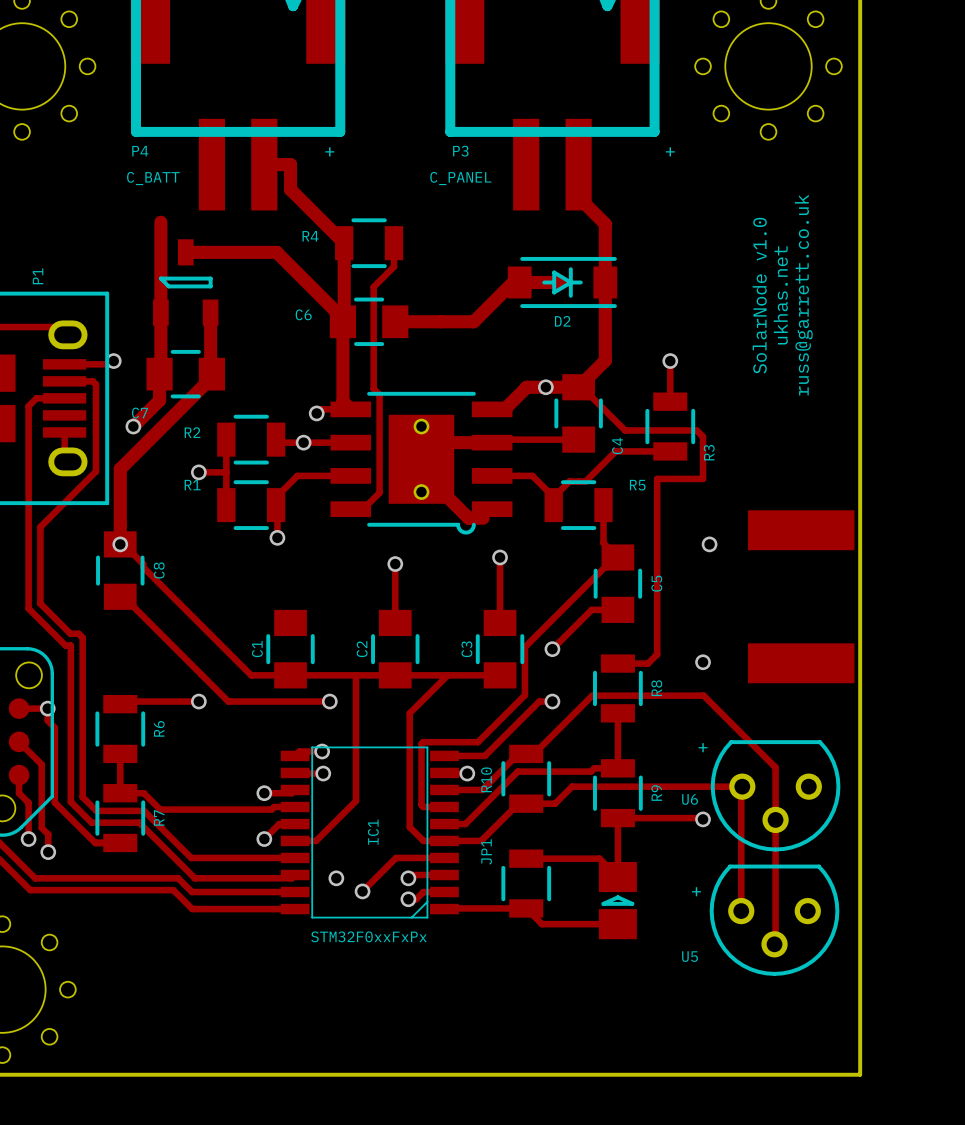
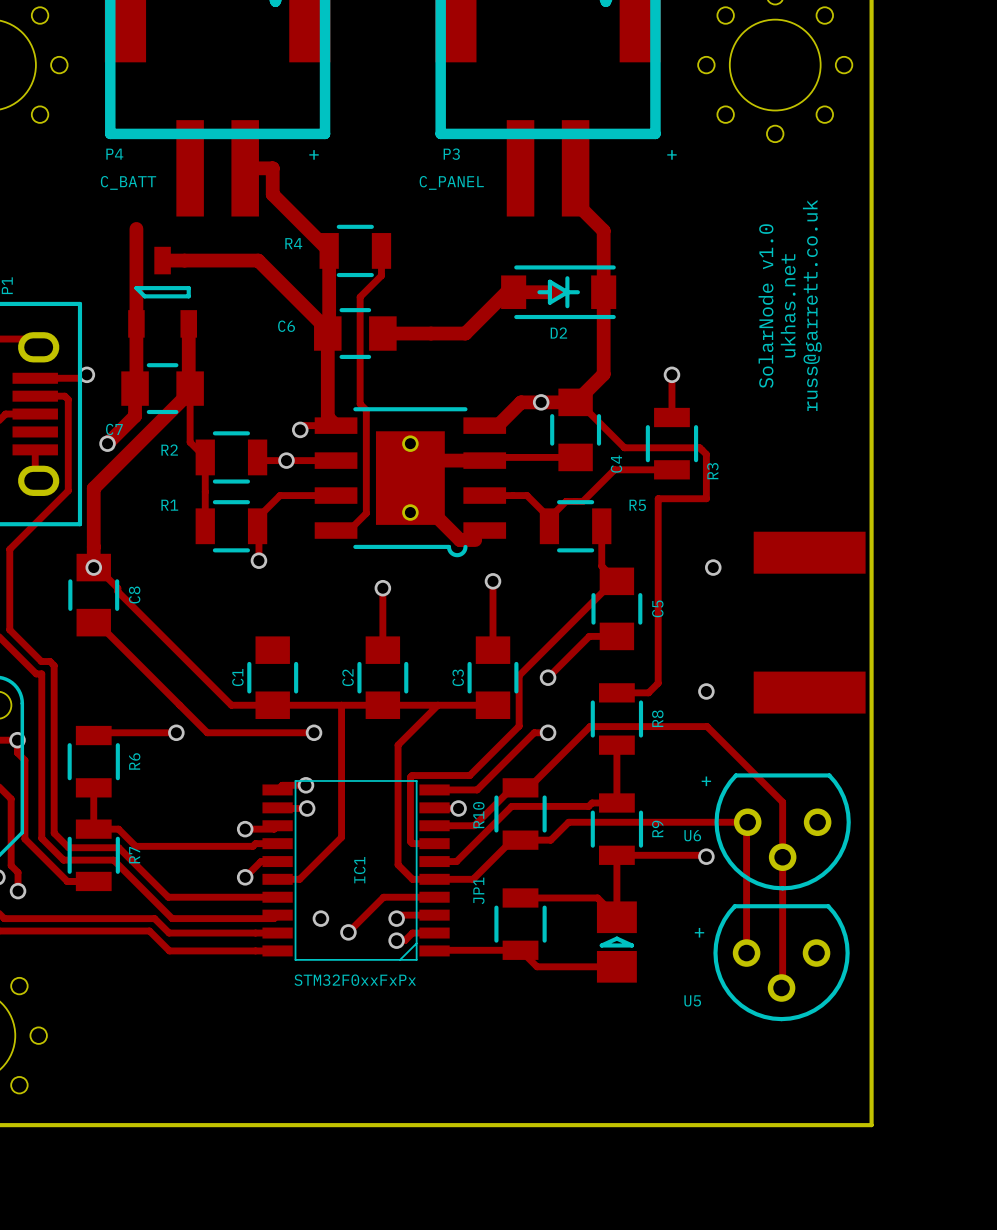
track: none -> (190, 392) (190, 442) (205, 457)
track: (198, 472) (226, 472) -> none
via: (198, 472) -> none

